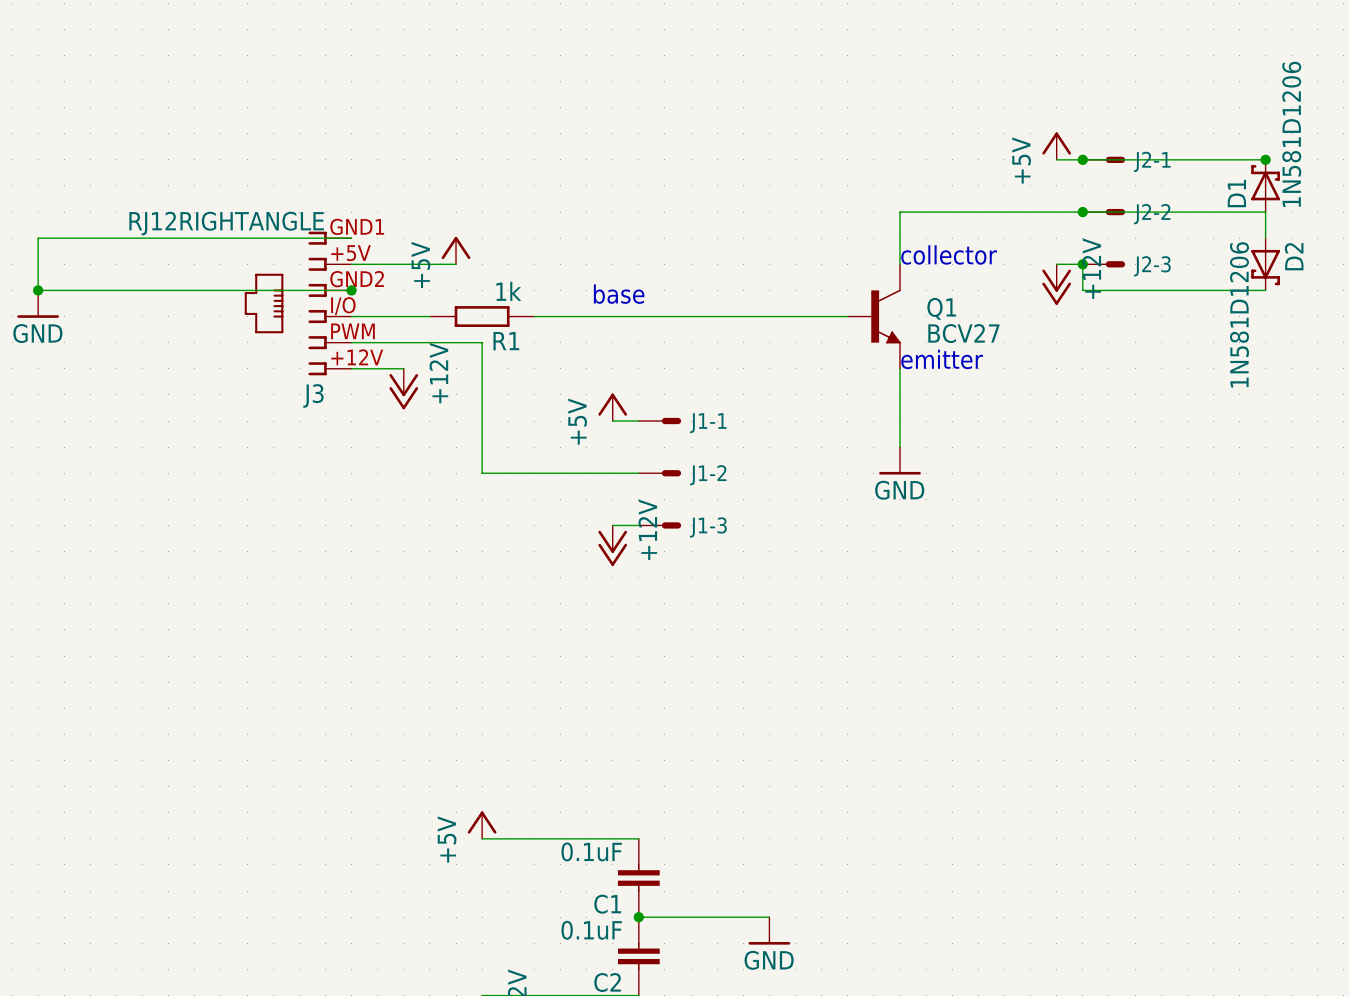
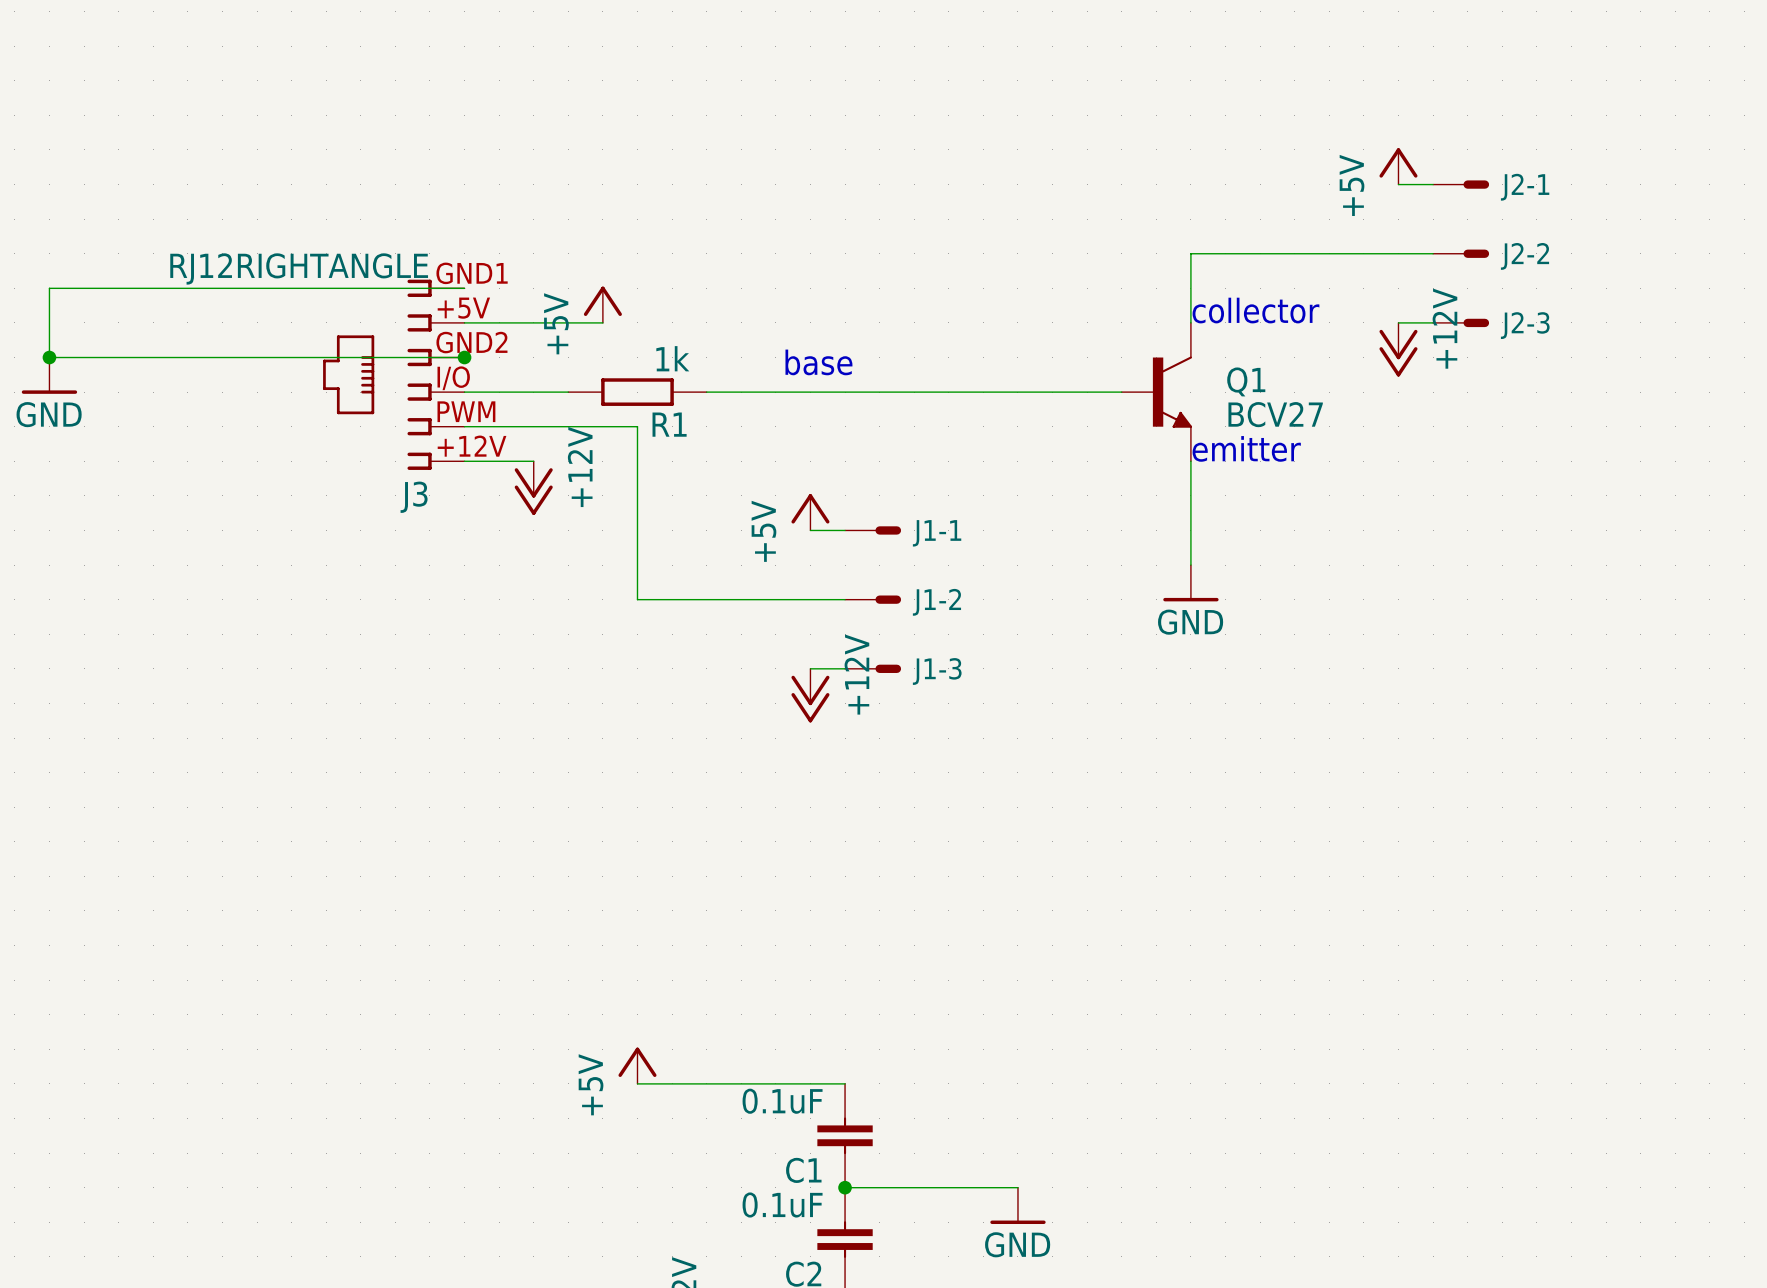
wire: (1082, 159) (1265, 159) -> none
junction: (1082, 159) -> none
junction: (1265, 159) -> none
D1: 1N581D1206 (1265, 185) -> none
wire: (1082, 212) (1265, 212) (1265, 238) -> none
junction: (1082, 212) -> none
wire: (1082, 264) (1082, 290) (1265, 290) -> none
junction: (1082, 264) -> none
D2: 1N581D1206 (1265, 264) -> none

